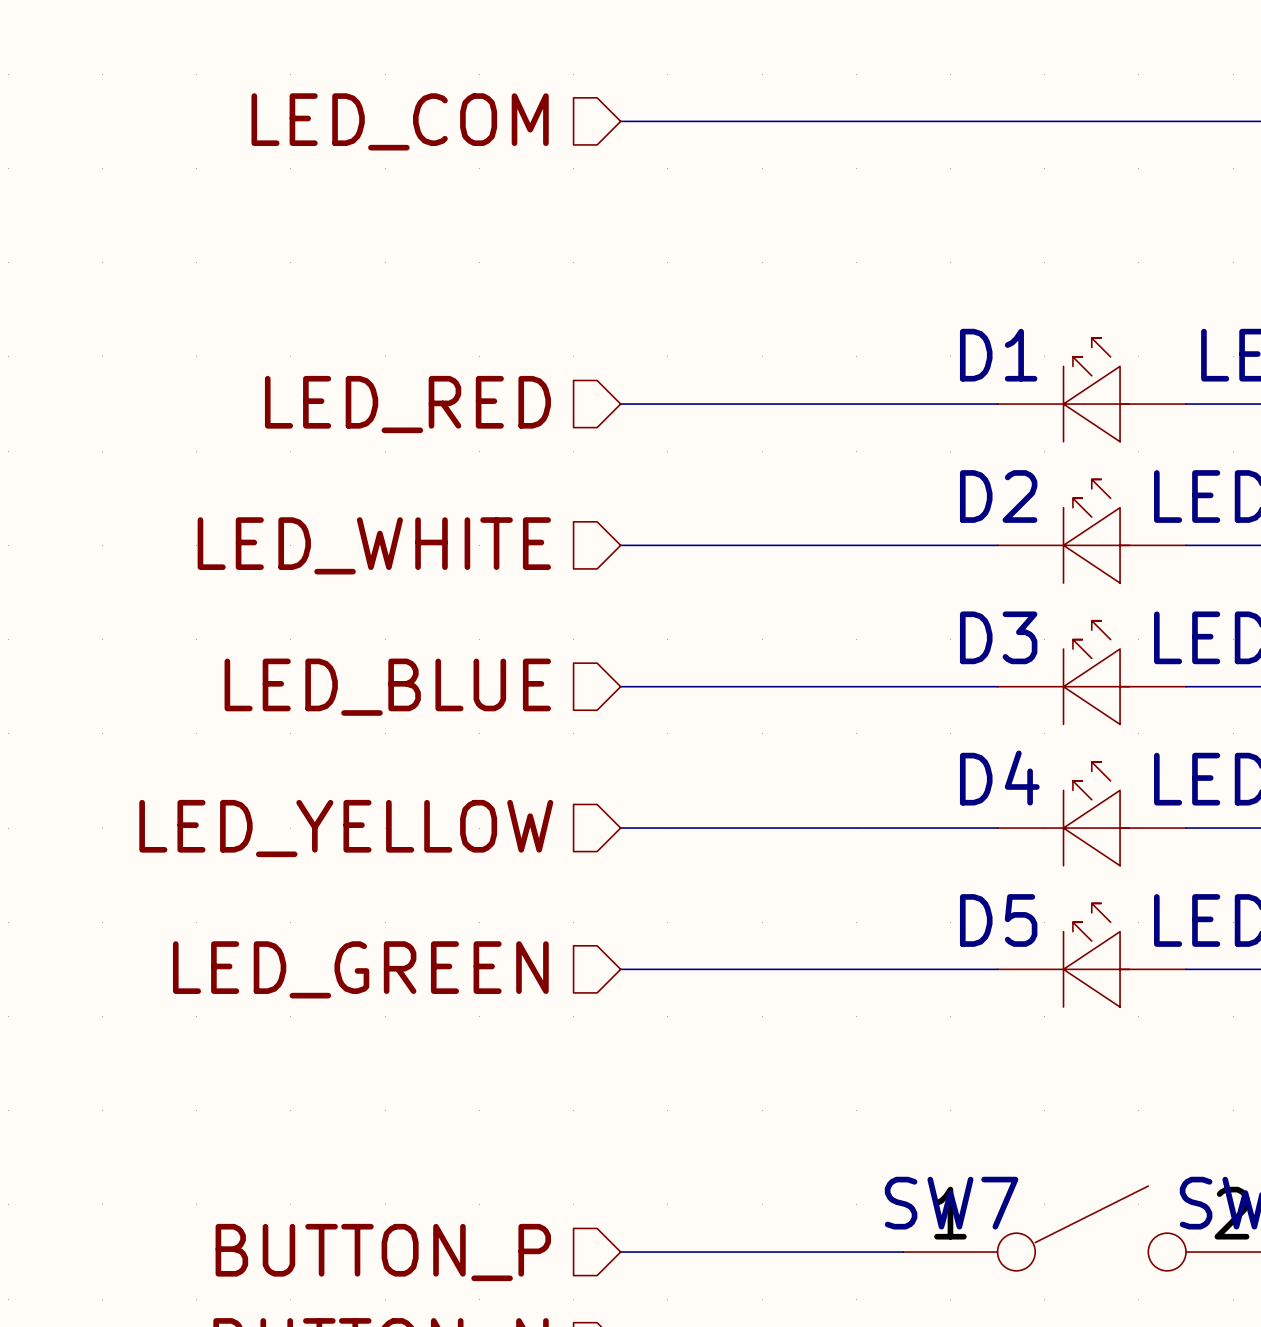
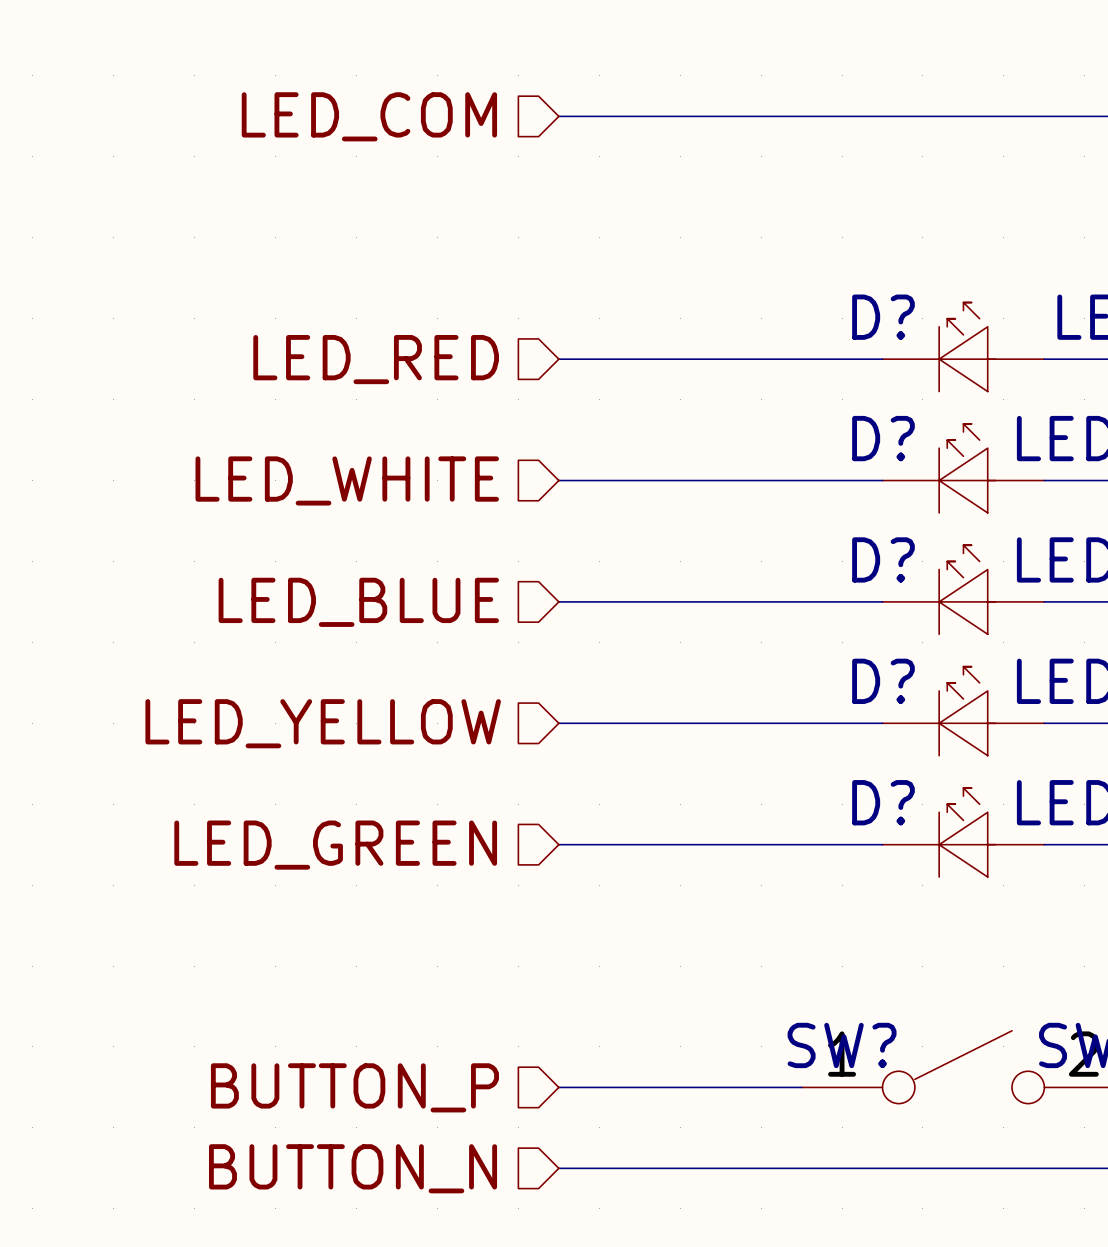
D1 name: D1 (998, 355) -> D? (883, 317)
D2 name: D2 (998, 496) -> D? (883, 438)
D3 name: D3 (998, 637) -> D? (883, 559)
D4 name: D4 (999, 778) -> D? (883, 681)
D5 name: D5 (998, 920) -> D? (883, 802)
SW7 name: SW7 (951, 1203) -> SW? (842, 1045)

